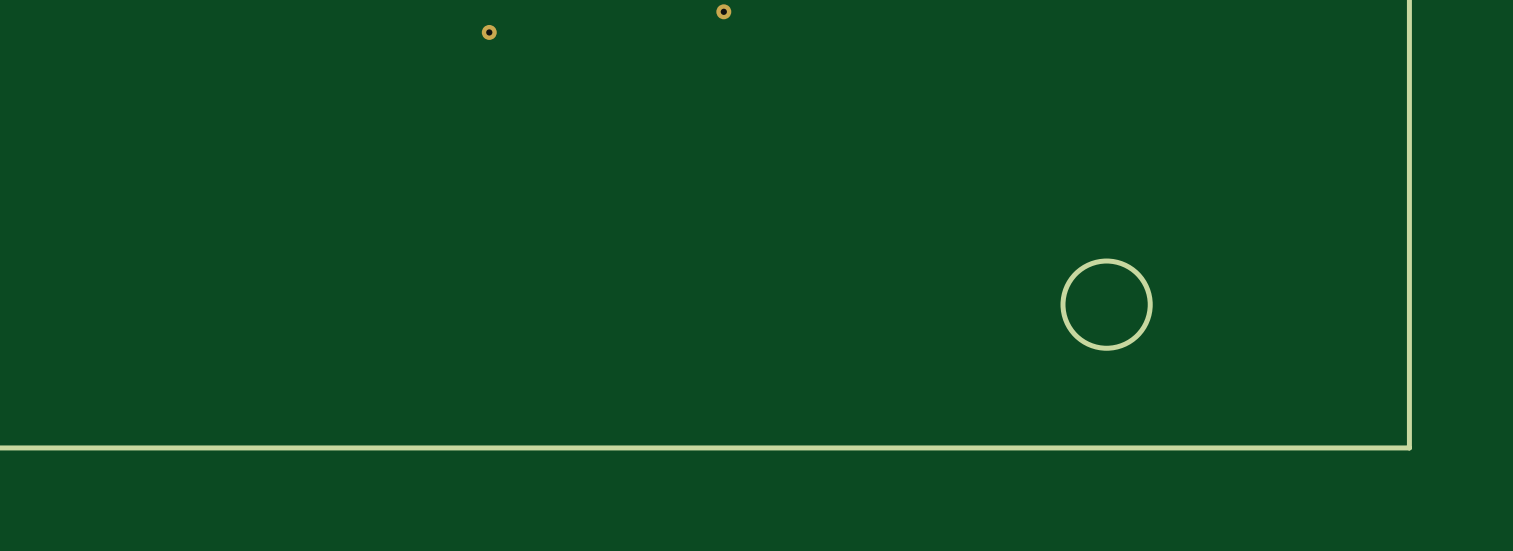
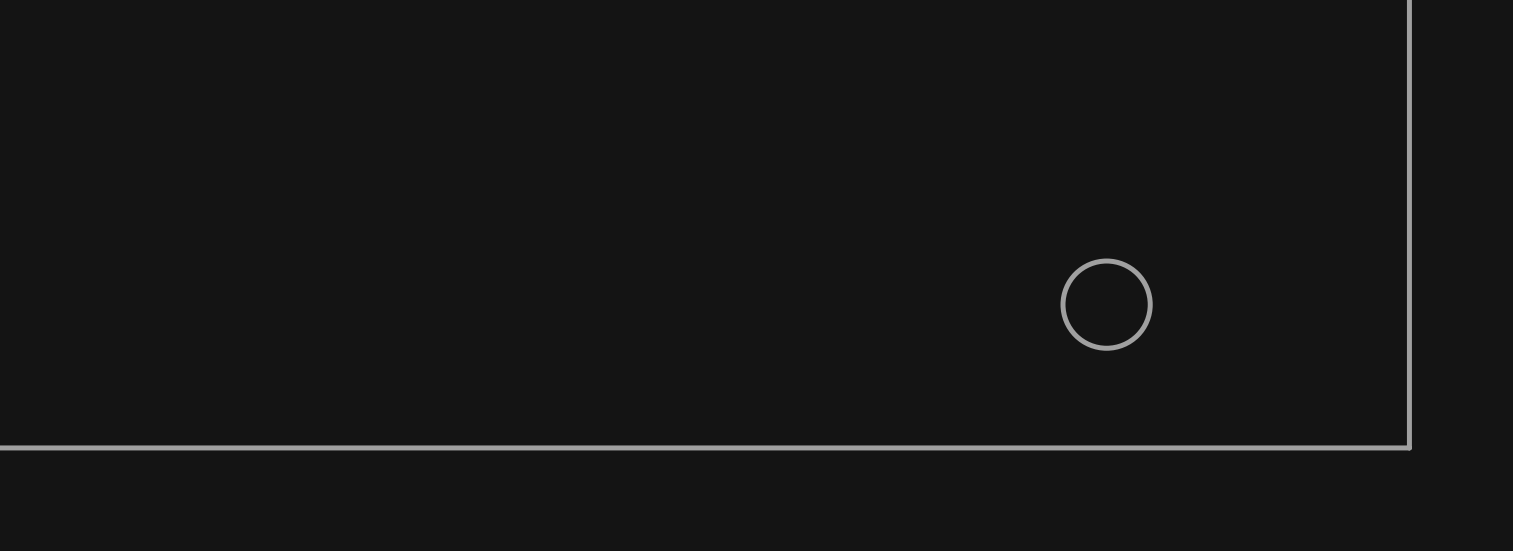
via: (723, 11) -> none
via: (489, 32) -> none

